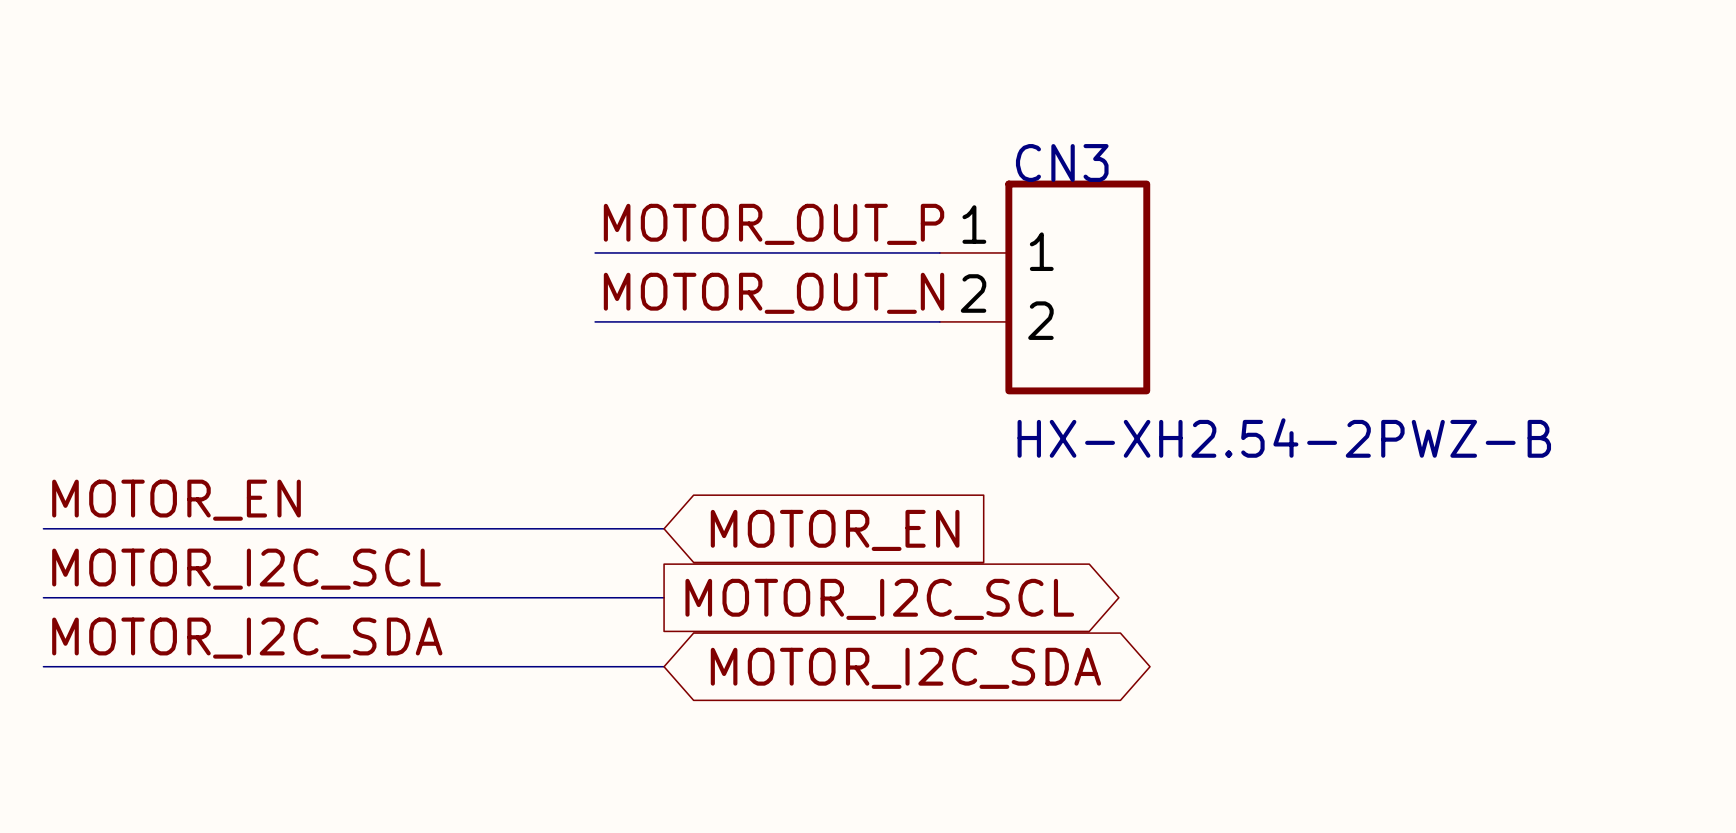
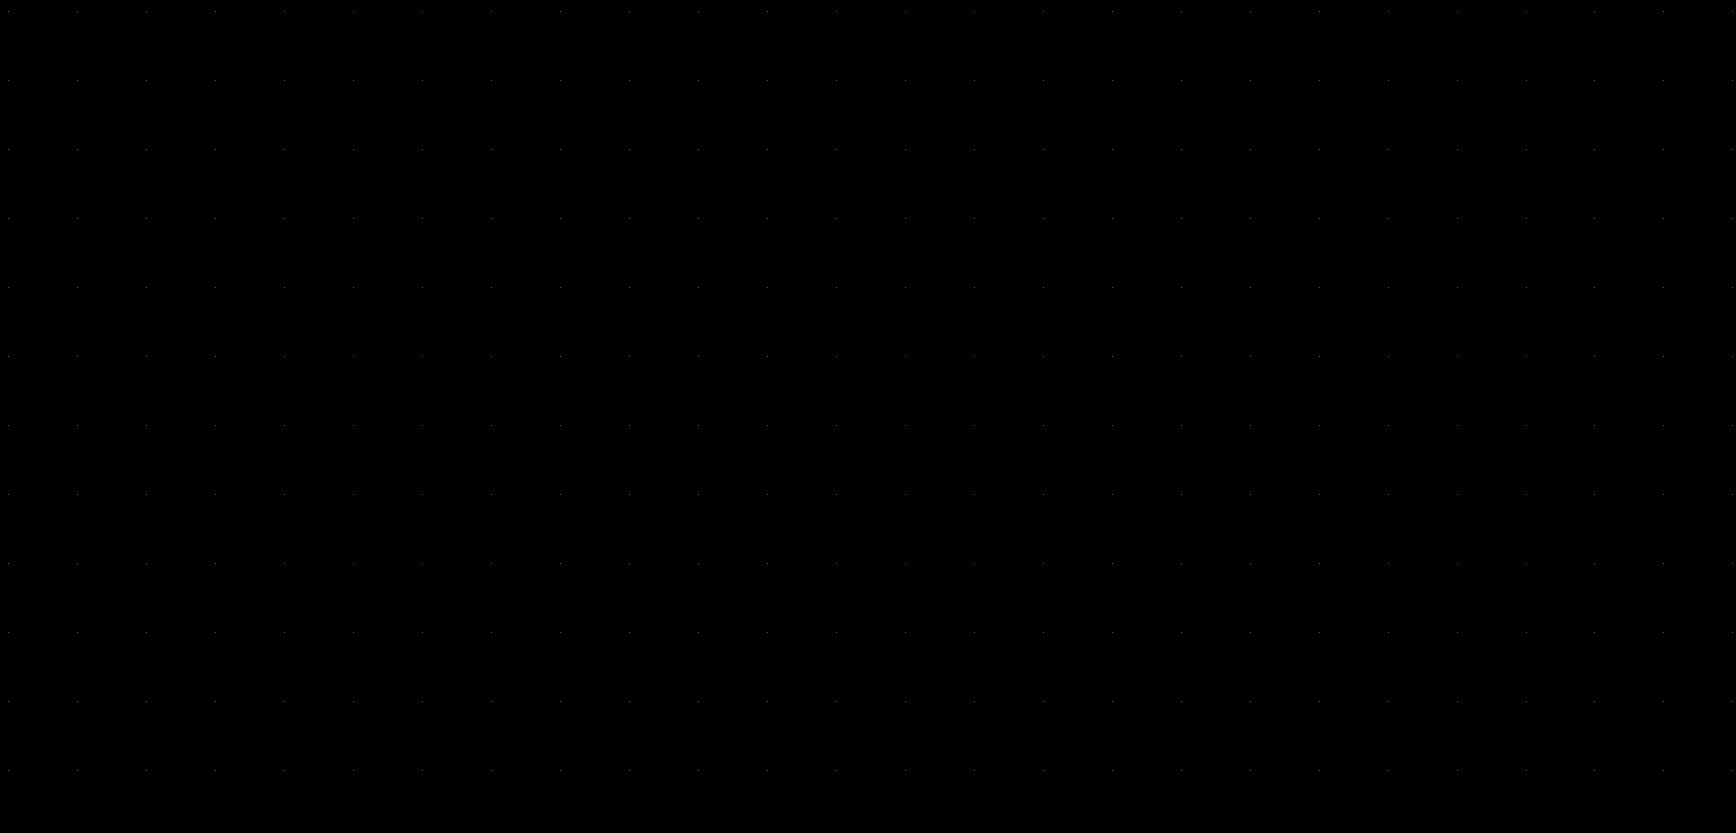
label: MOTOR_OUT_P (774, 224) -> none
wire: (595, 252) (939, 252) -> none
CN3: HX-XH2.54-2PWZ-B (1045, 287) -> none
label: MOTOR_OUT_N (774, 293) -> none
wire: (595, 321) (939, 321) -> none
label: MOTOR_EN (176, 500) -> none
wire: (43, 528) (664, 528) -> none
global label: MOTOR_EN (835, 530) -> none
label: MOTOR_I2C_SCL (246, 569) -> none
wire: (43, 597) (664, 597) -> none
global label: MOTOR_I2C_SCL (879, 599) -> none
label: MOTOR_I2C_SDA (247, 638) -> none
wire: (43, 666) (664, 666) -> none
global label: MOTOR_I2C_SDA (905, 668) -> none

